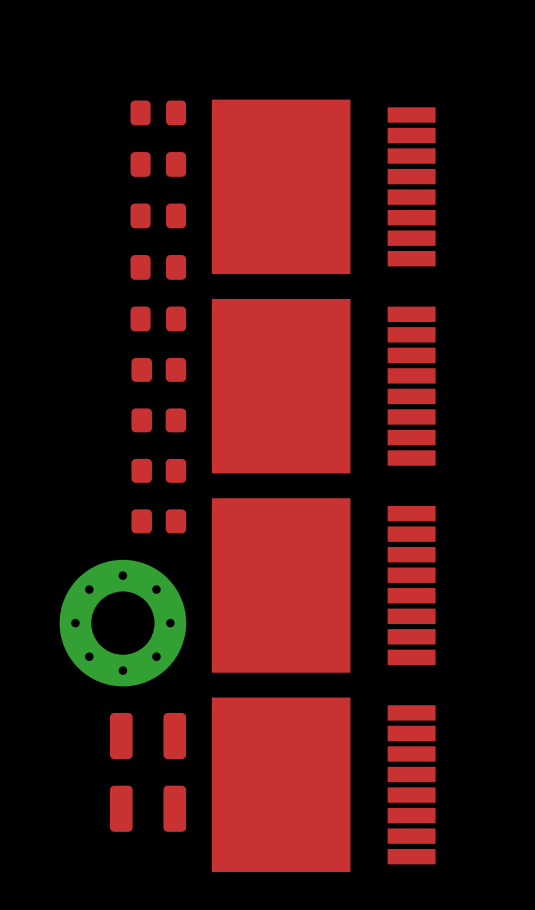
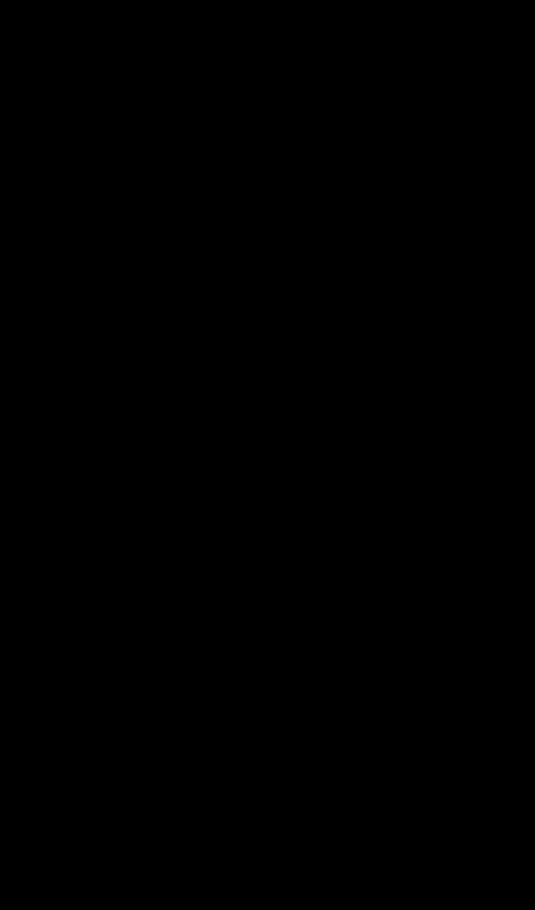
part: (158, 112) -> none
part: (158, 164) -> none
part: (323, 186) -> none
part: (158, 215) -> none
part: (158, 267) -> none
part: (158, 318) -> none
part: (158, 369) -> none
part: (323, 386) -> none
part: (158, 420) -> none
part: (158, 470) -> none
part: (158, 521) -> none
part: (323, 585) -> none
part: (122, 623) -> none
part: (148, 736) -> none
part: (323, 784) -> none
part: (148, 808) -> none

